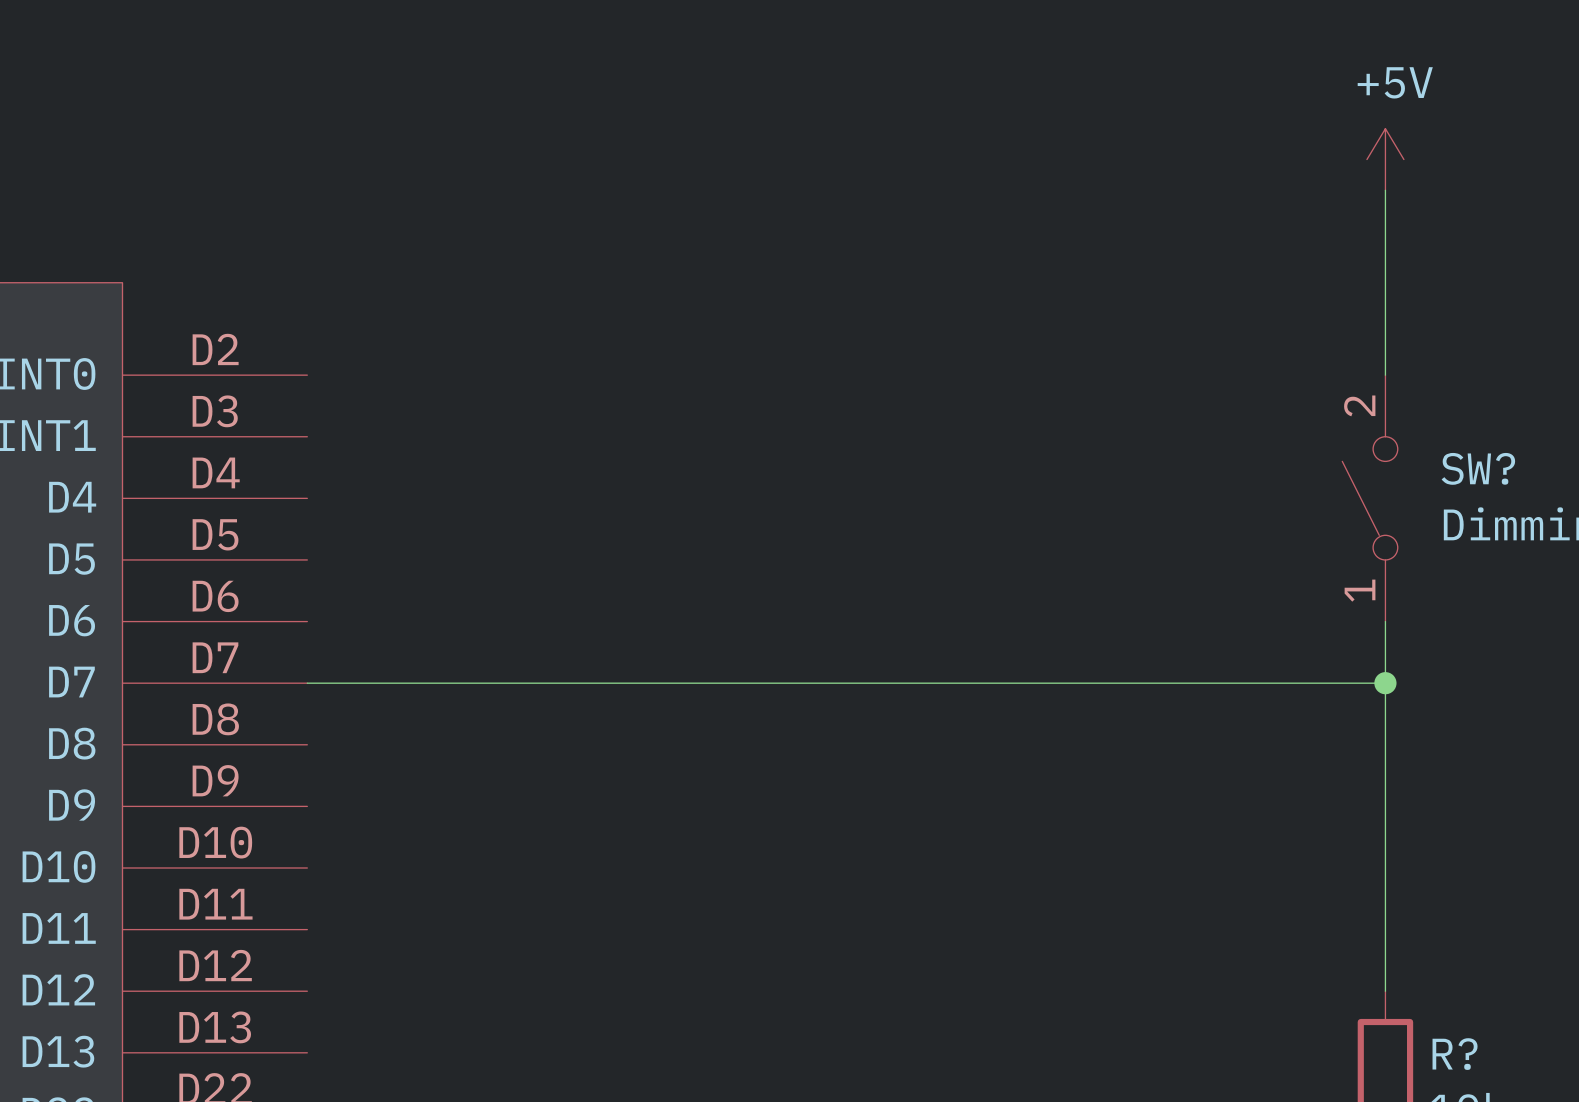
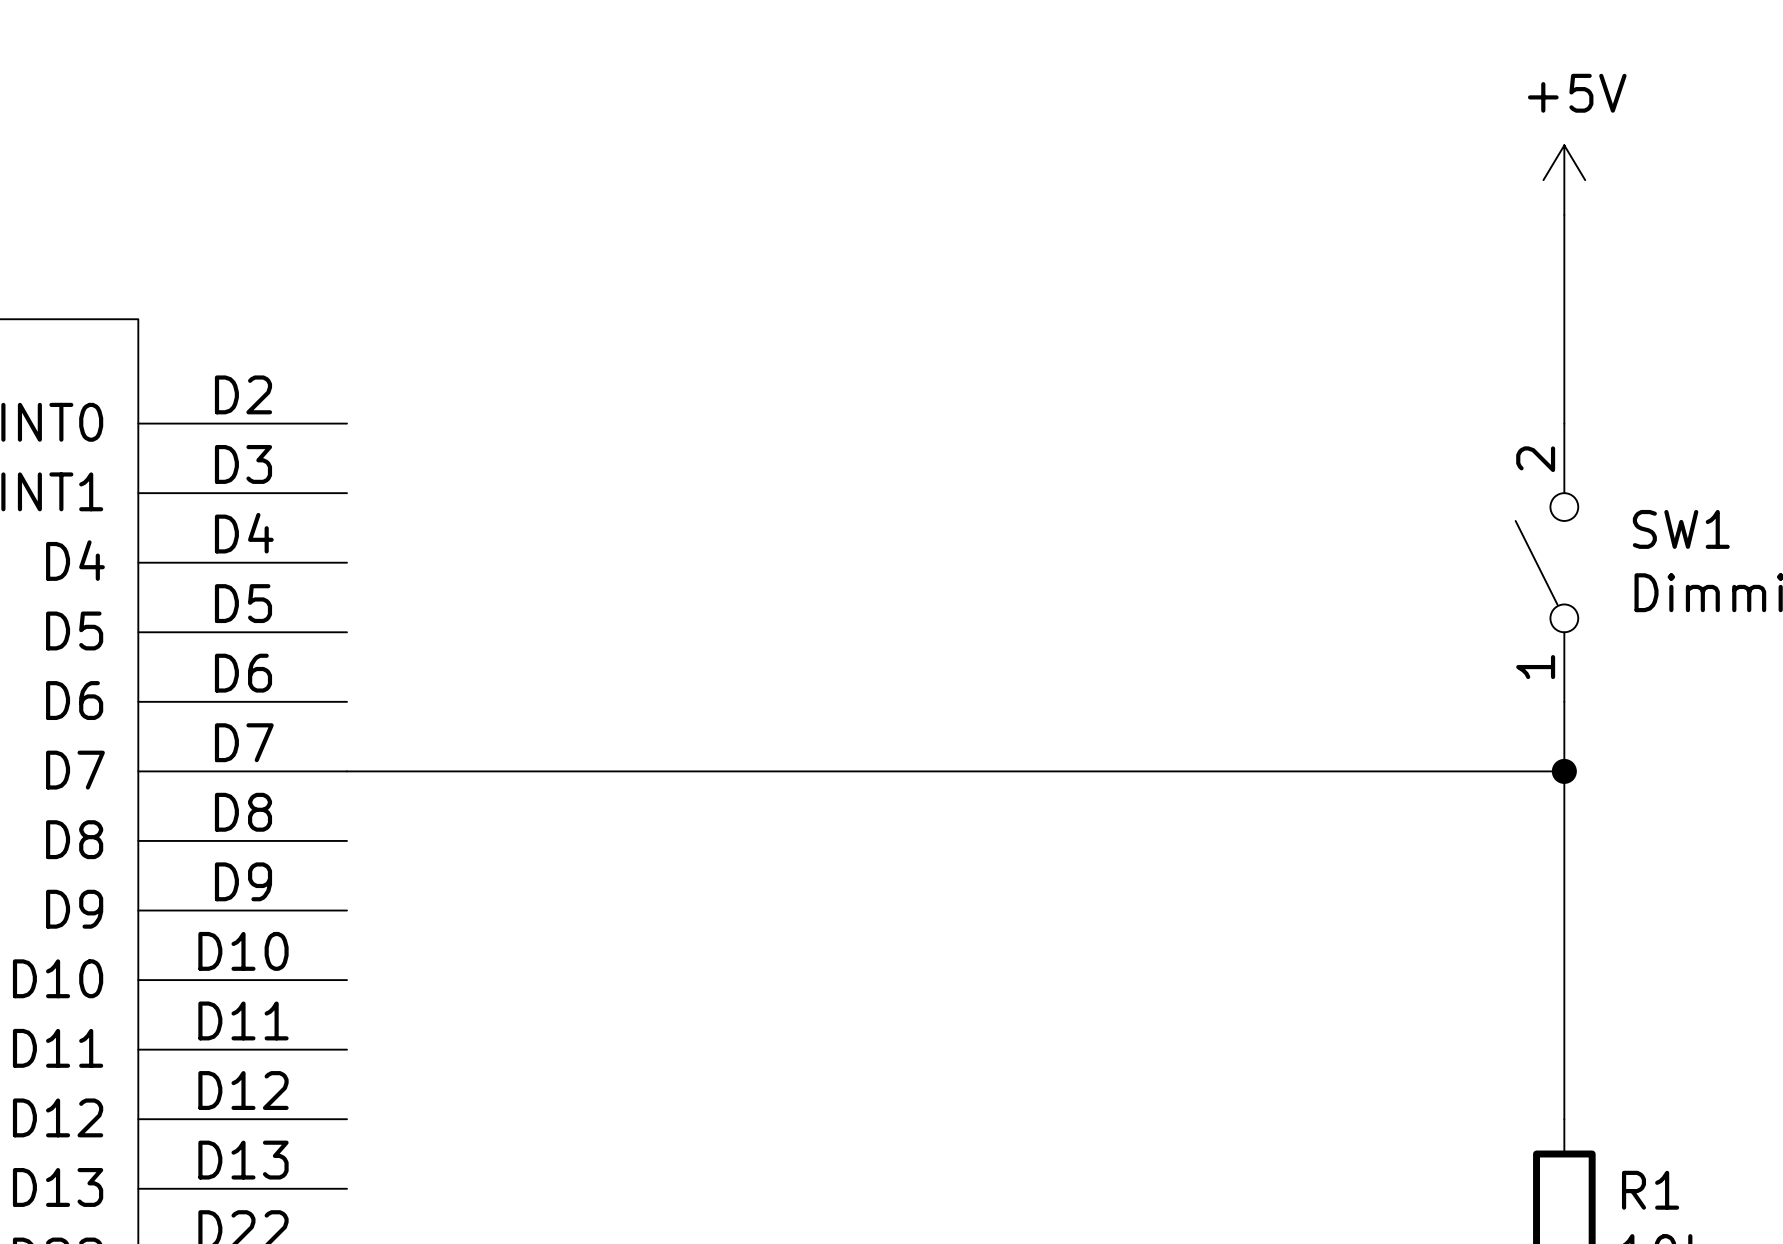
SW? name: SW? (1478, 468) -> SW1 (1681, 529)
R? name: R? (1455, 1054) -> R1 (1650, 1190)

